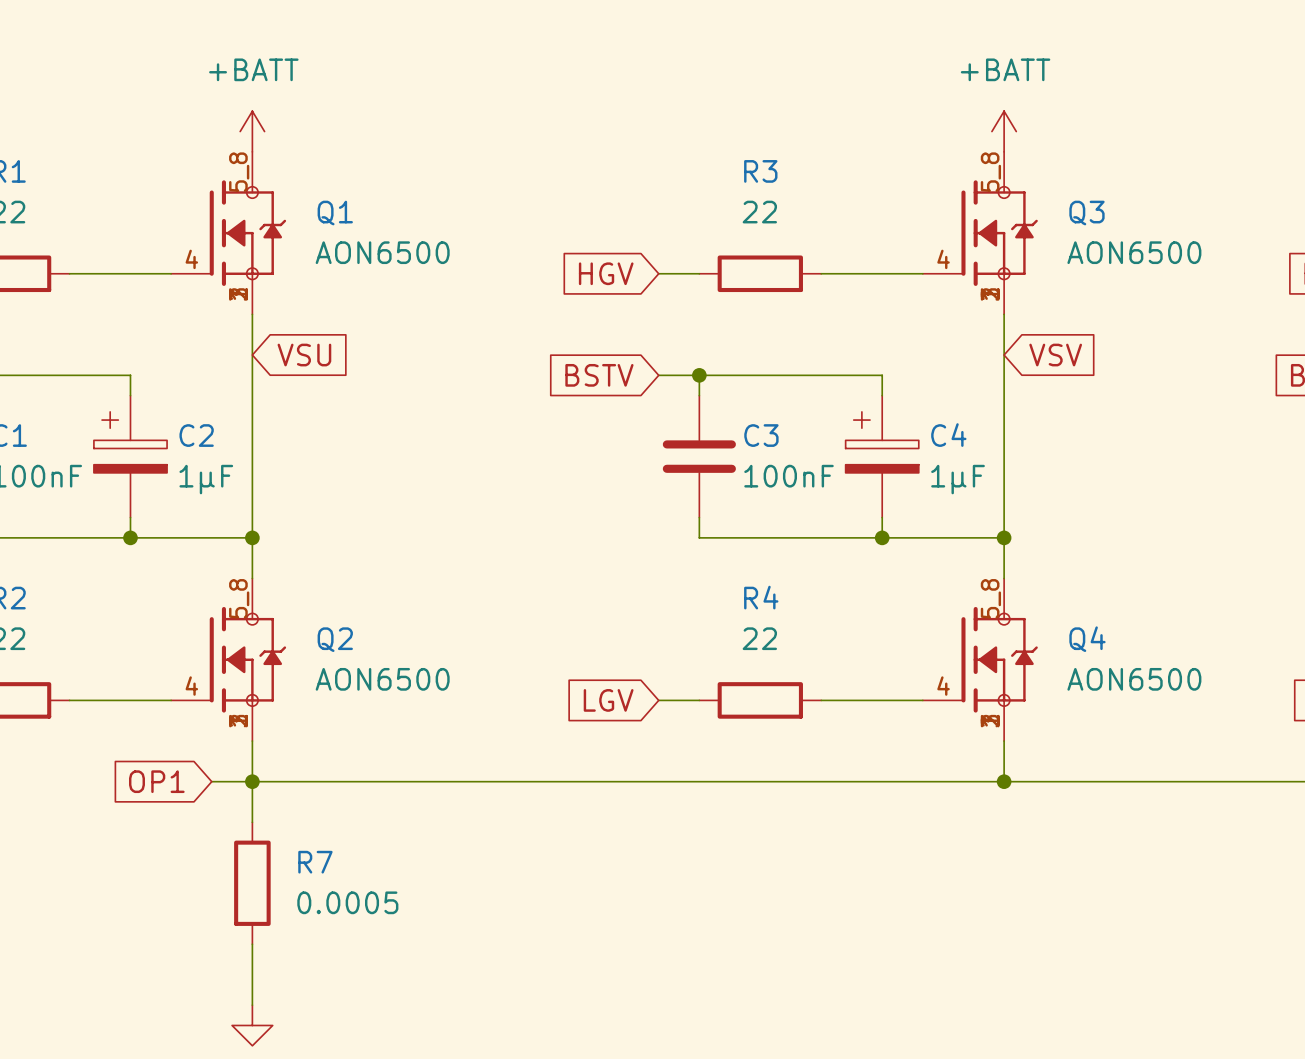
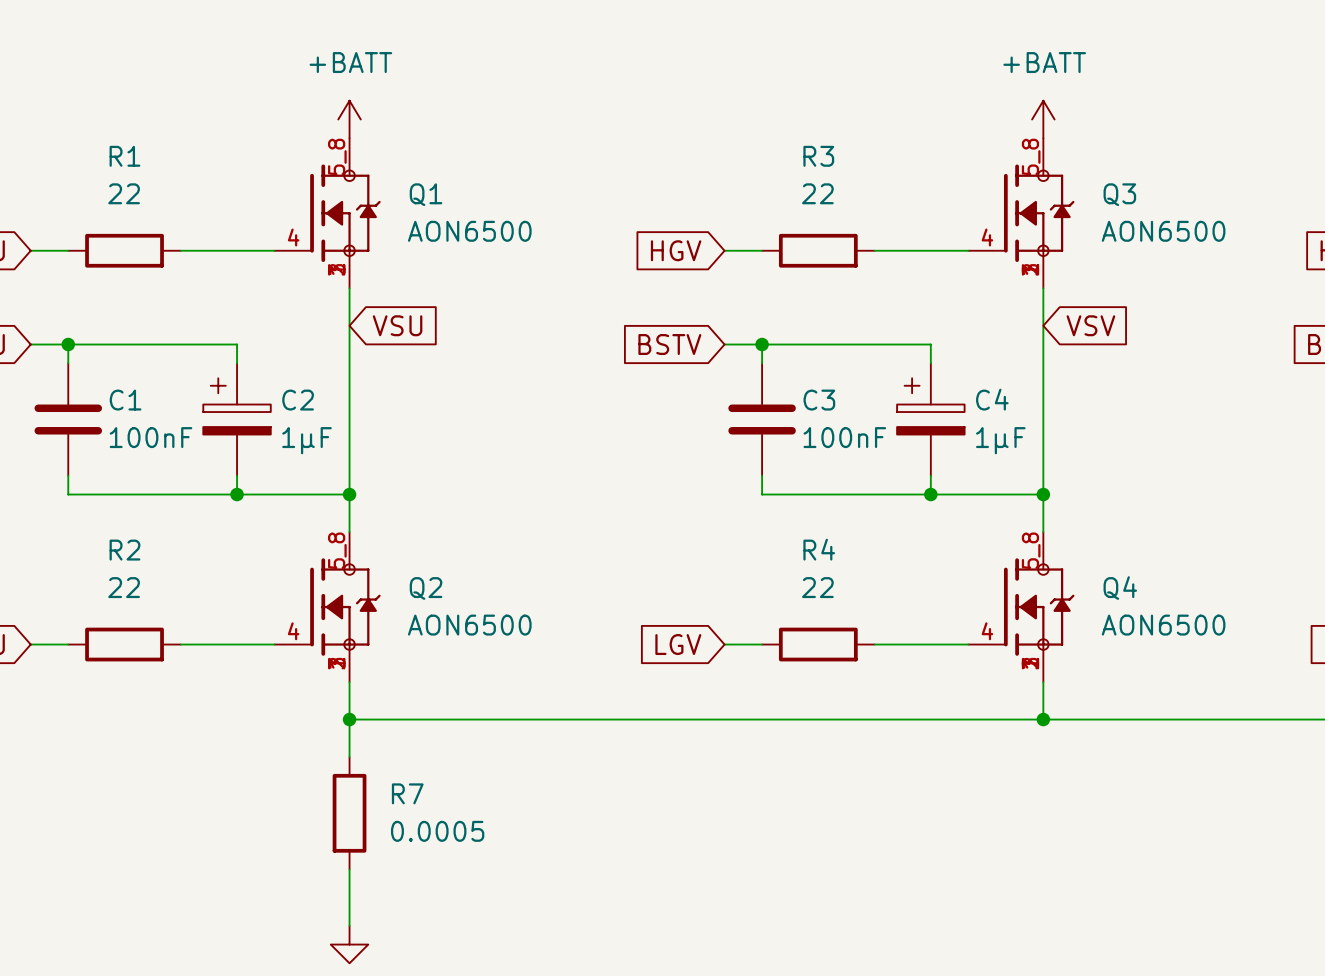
global label: OP1 (156, 781) -> none
wire: (211, 781) (252, 781) -> none

